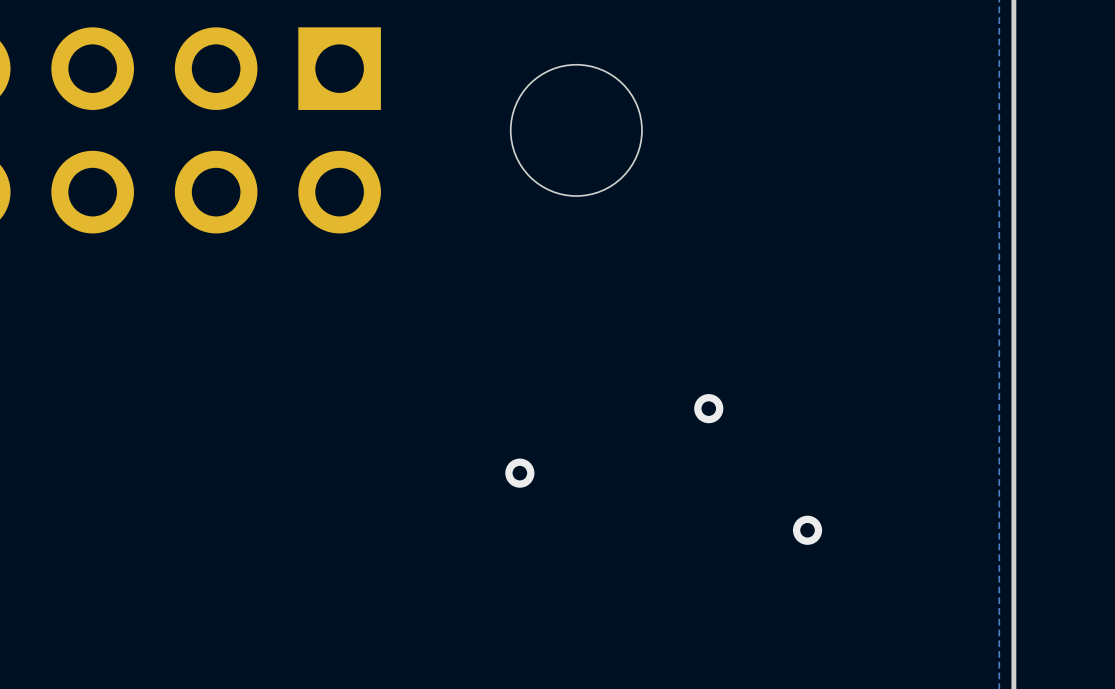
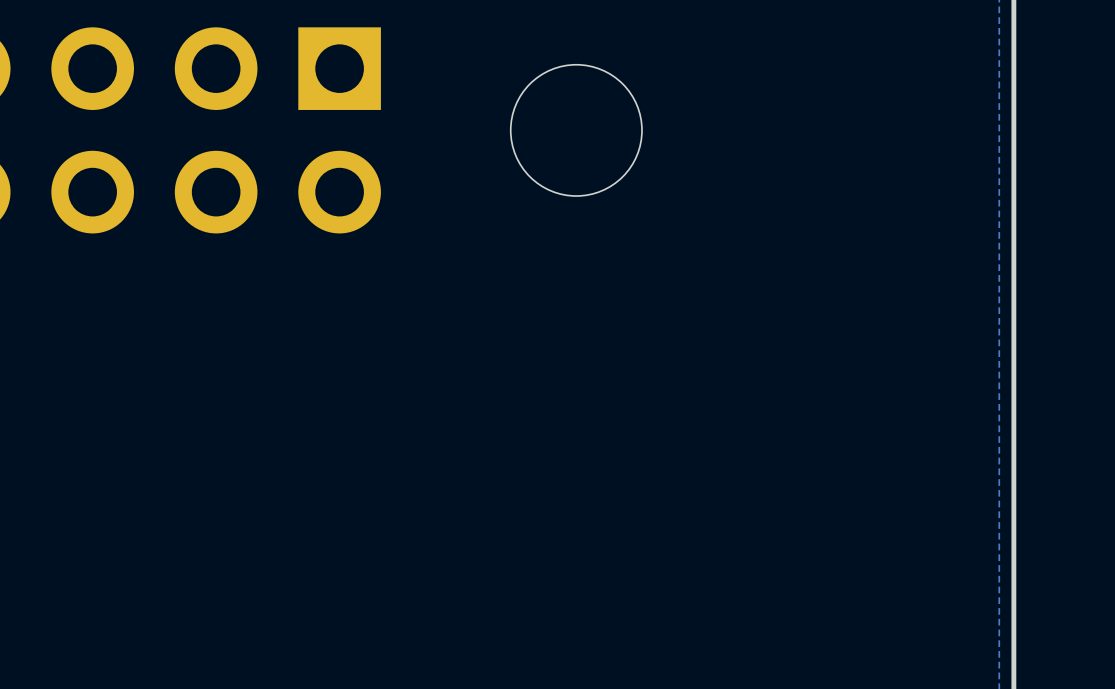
via: (708, 408) -> none
via: (519, 473) -> none
via: (807, 530) -> none

